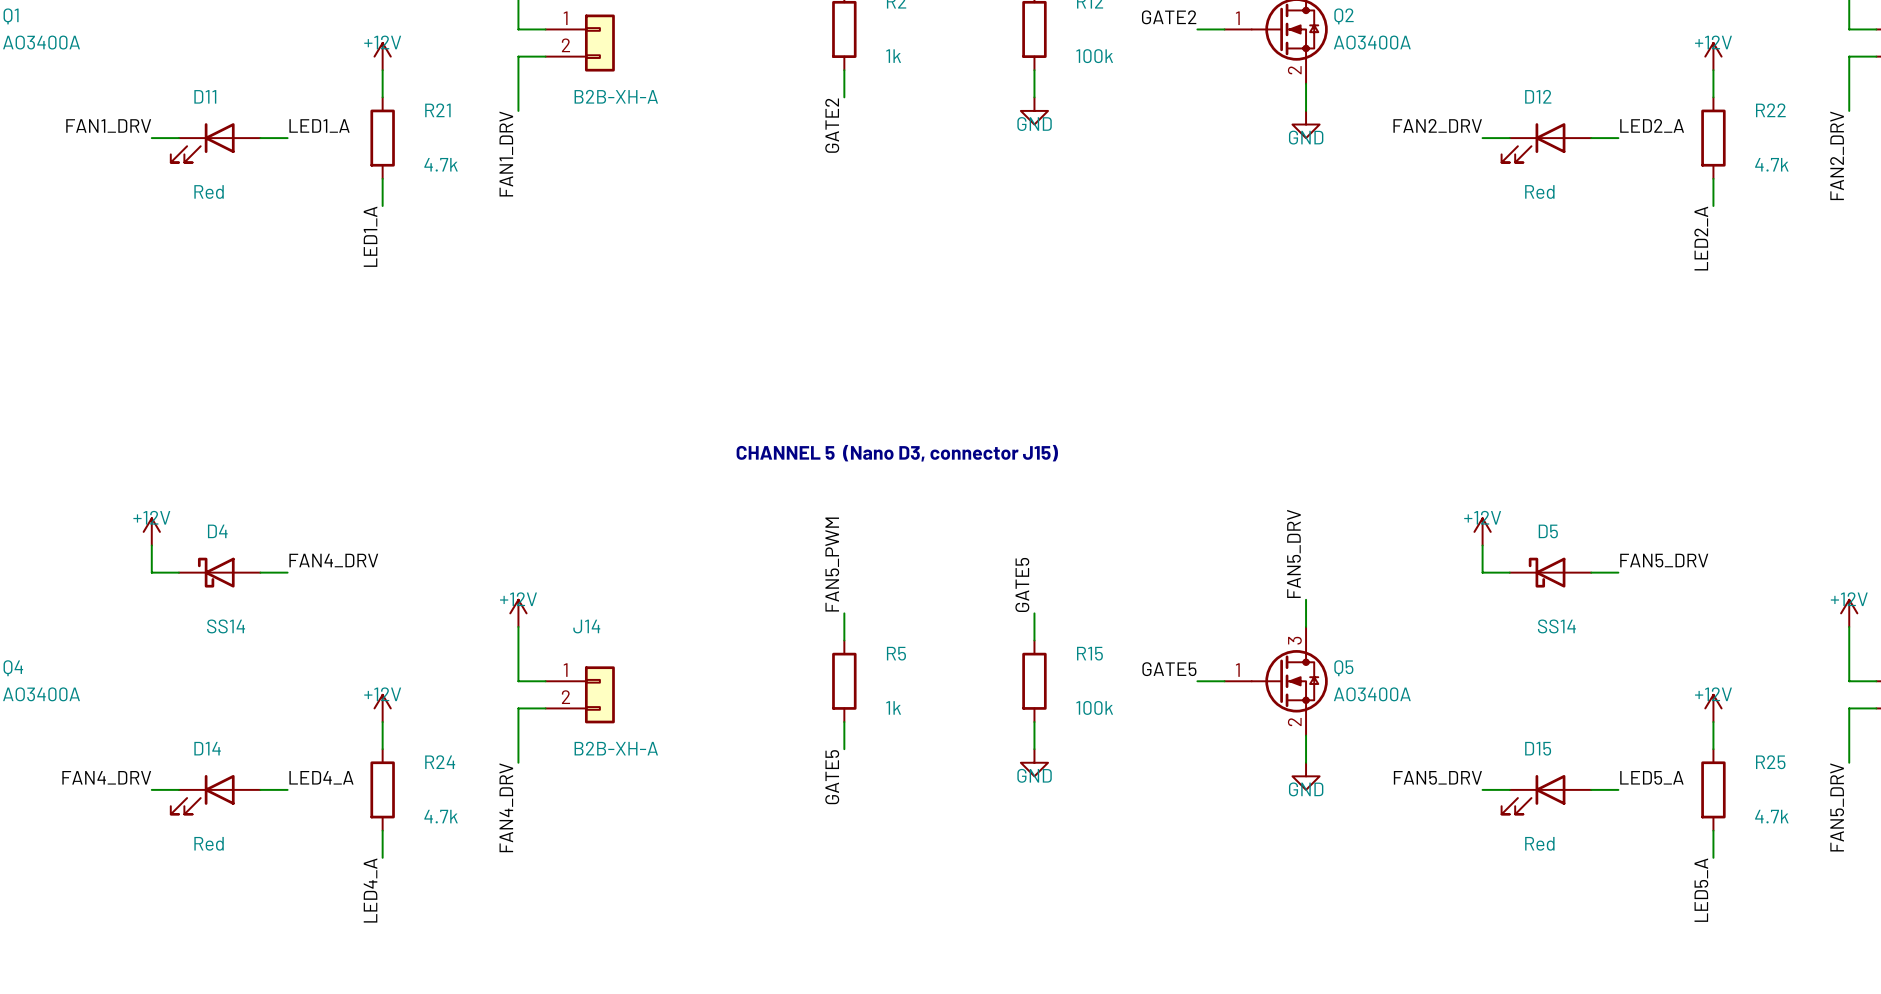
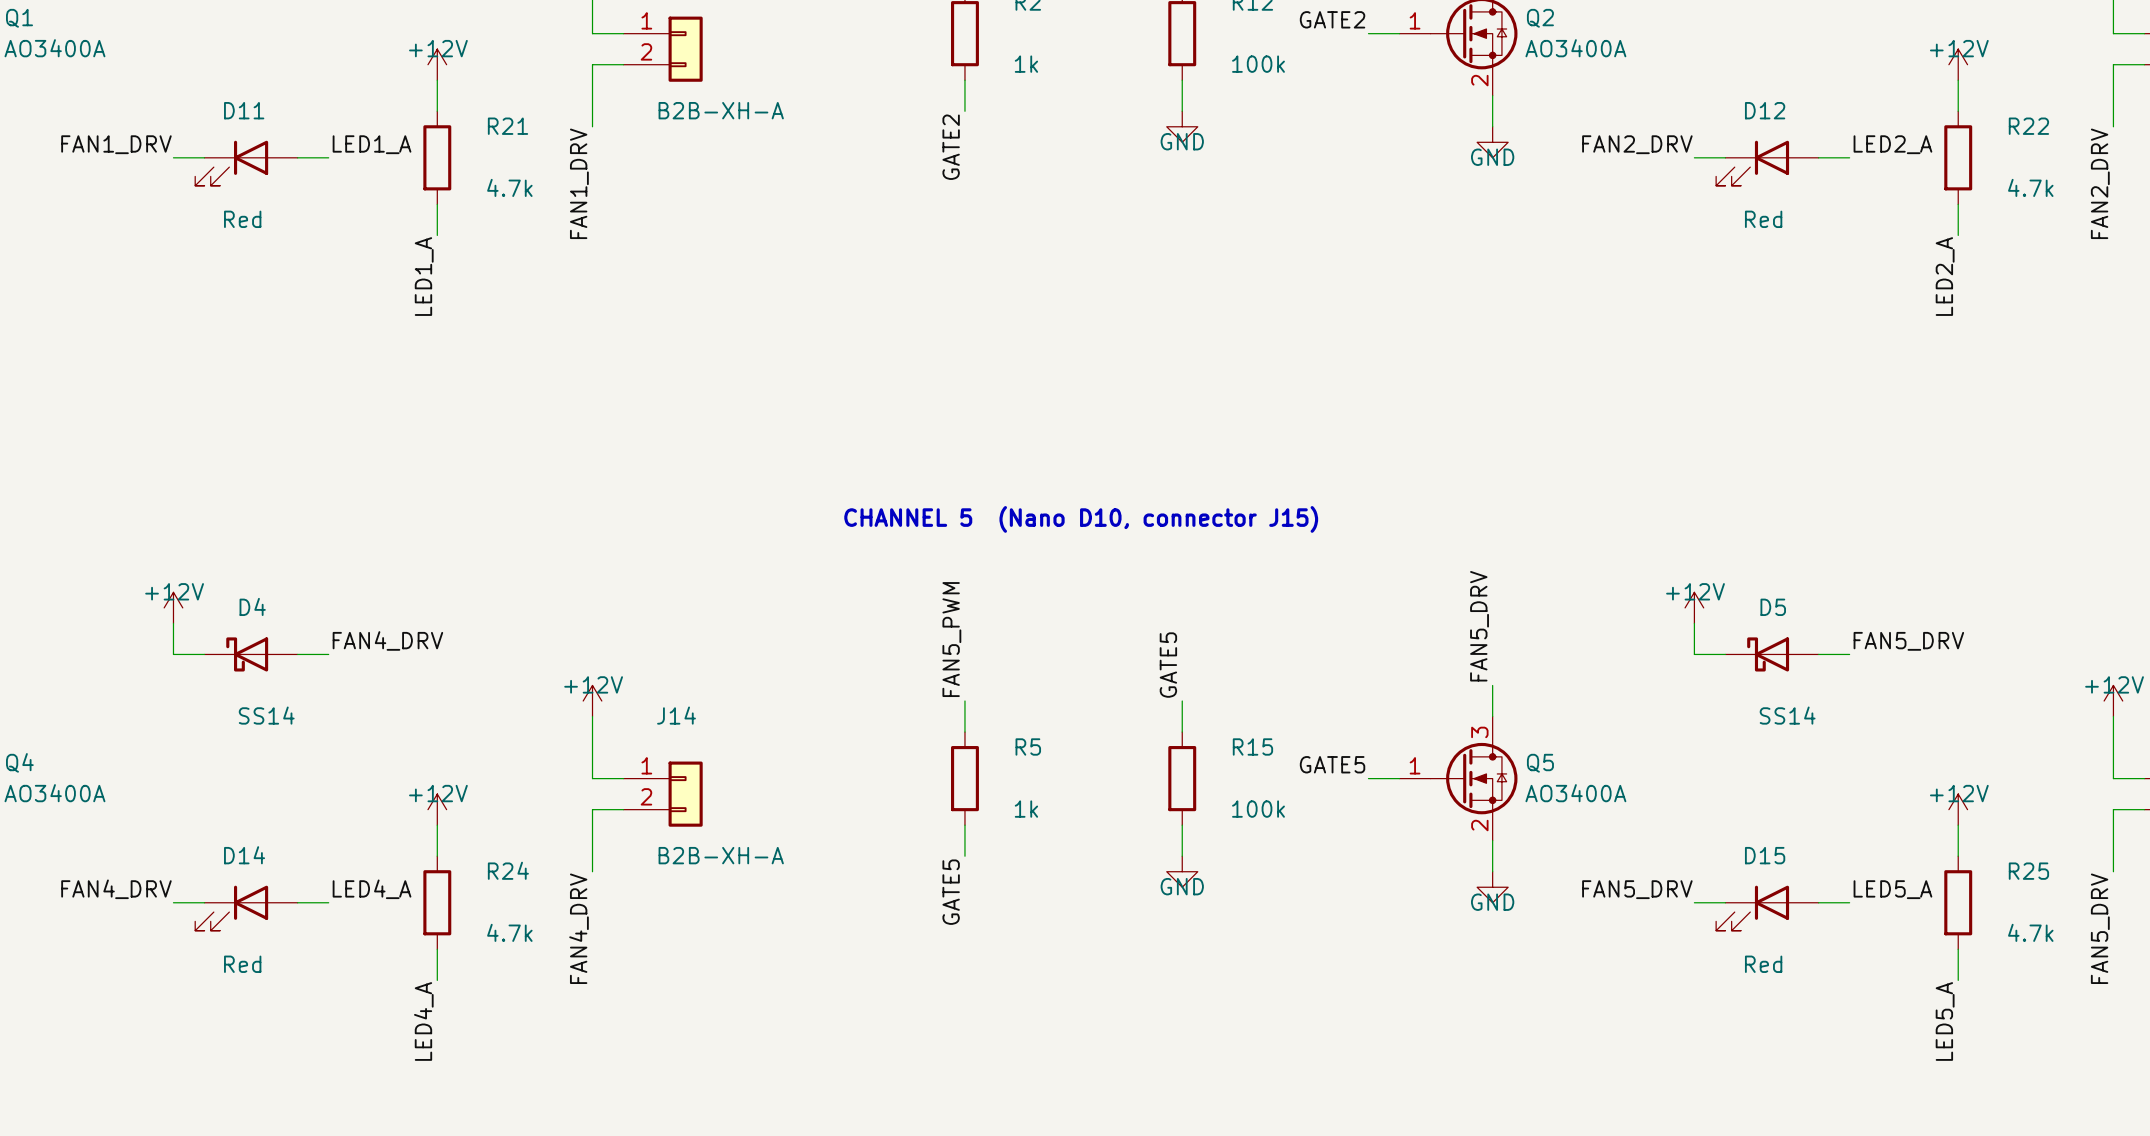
text: CHANNEL 5 (Nano D3, connector J15) (897, 453) -> CHANNEL 5 (Nano D10, connector J15) (1081, 519)

